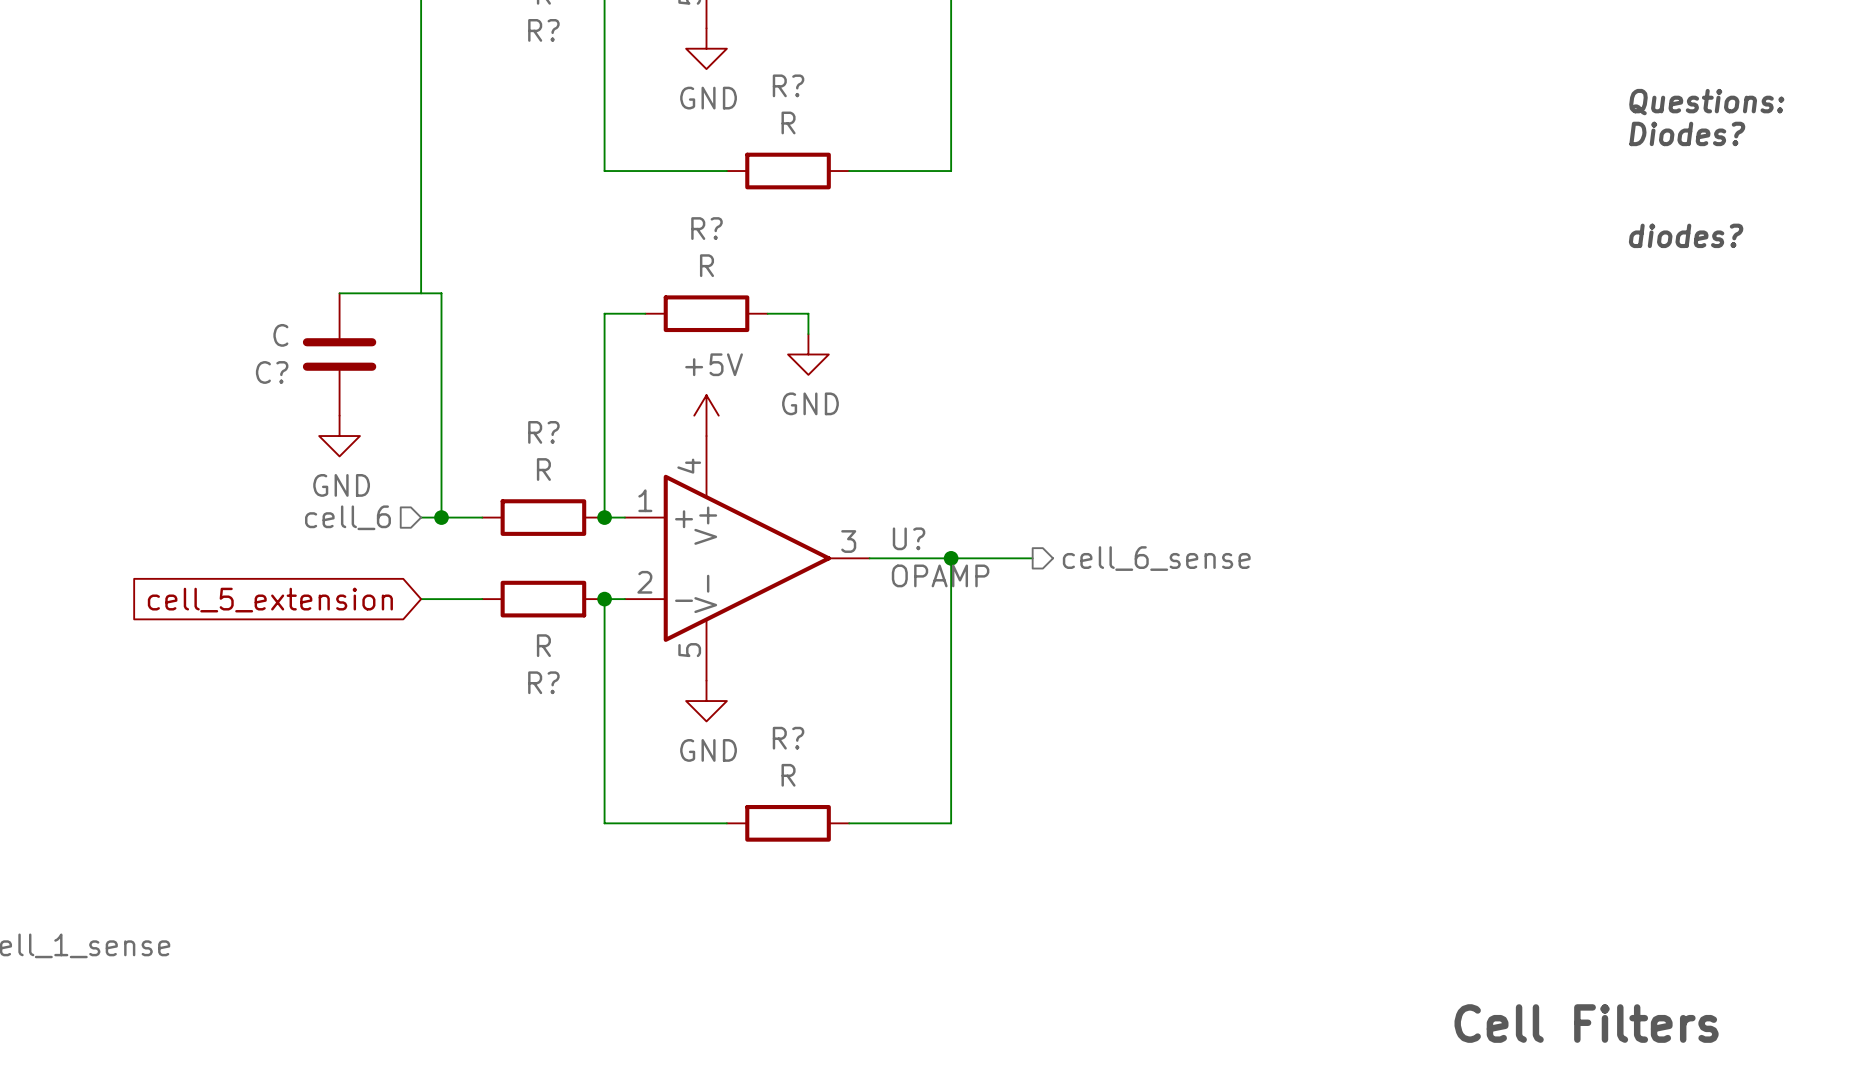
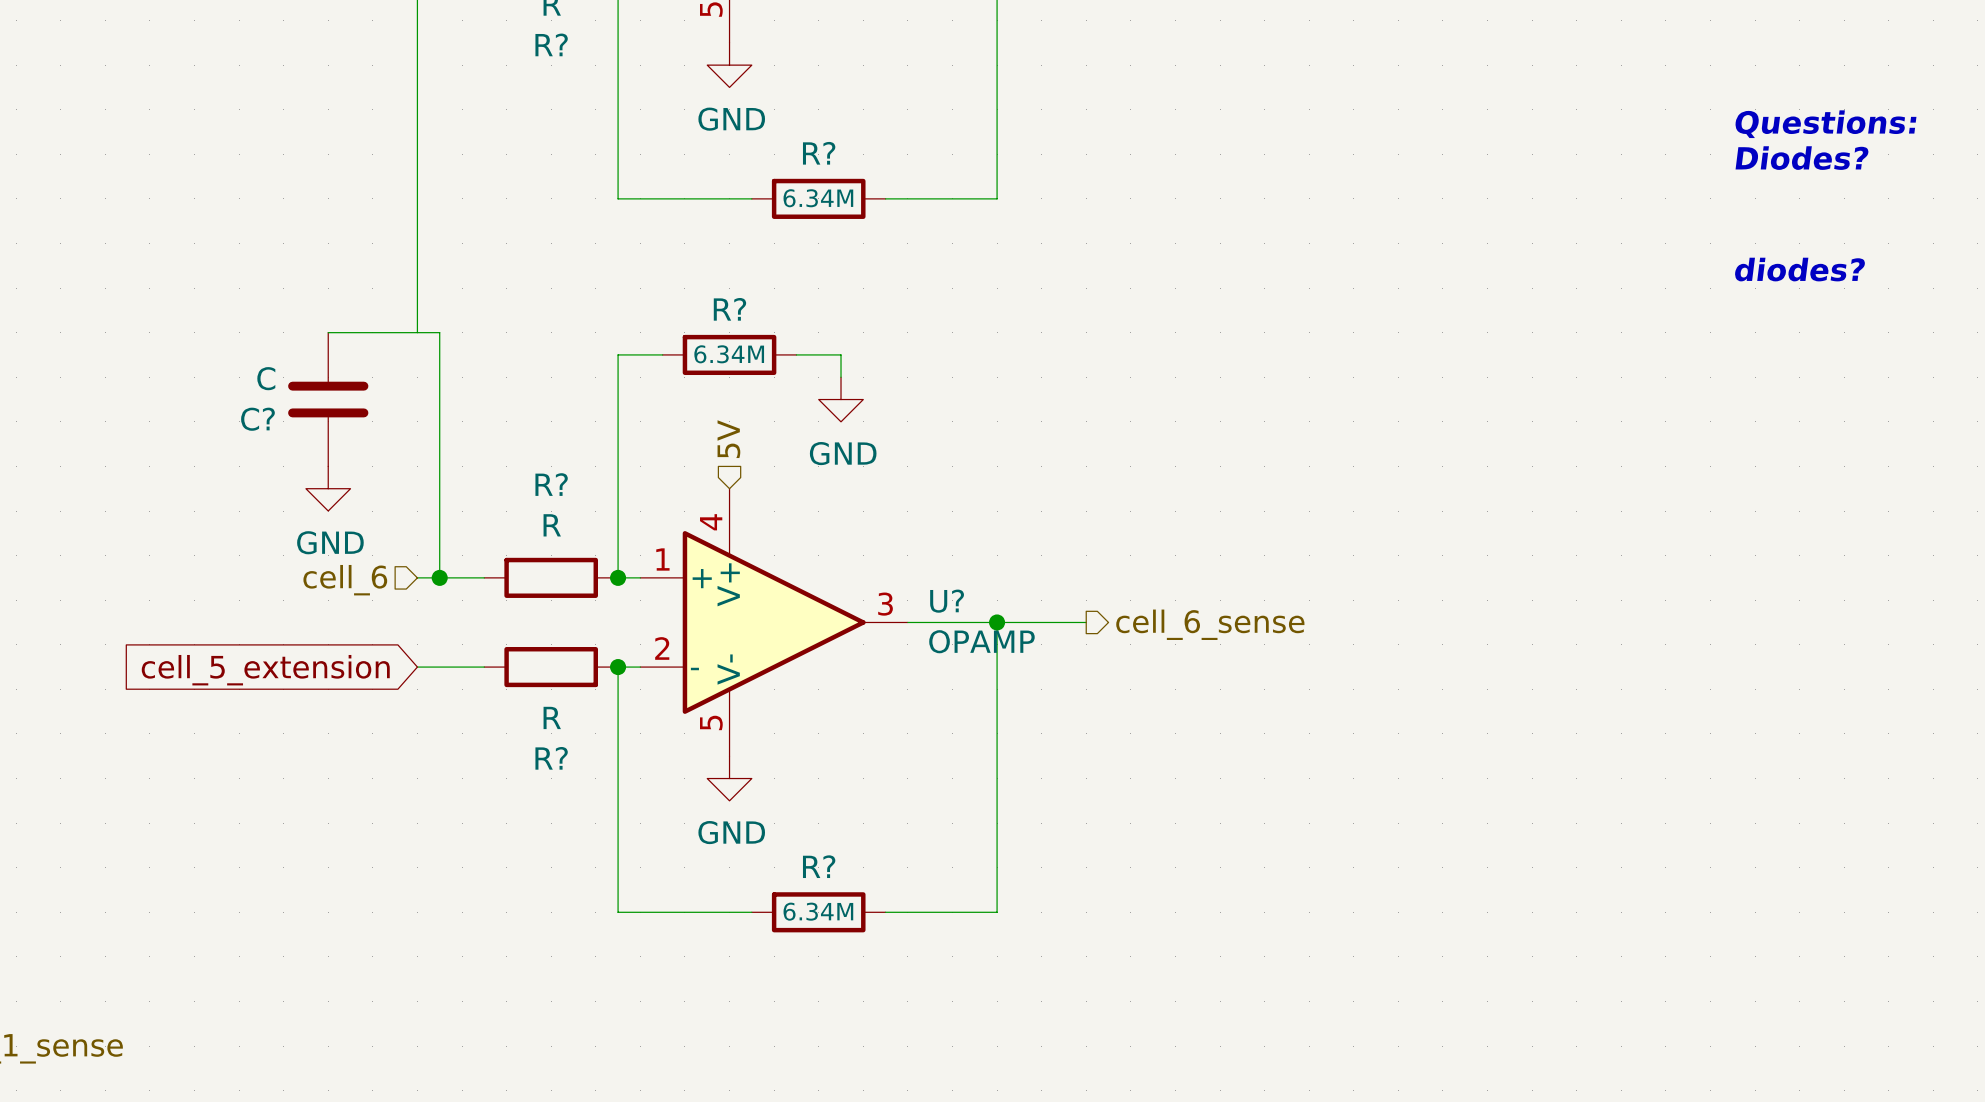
R? name position: R? (788, 85) -> R? (819, 153)
R? value: R (788, 122) -> 6.34M (818, 198)
R? name position: R? (706, 228) -> R? (729, 309)
R? value: R (706, 265) -> 6.34M (729, 354)
hierarchical label: none -> 5V (728, 439)
power symbol: +5V (706, 415) -> none
R? name position: R? (788, 738) -> R? (819, 866)
R? value: R (788, 775) -> 6.34M (818, 911)

